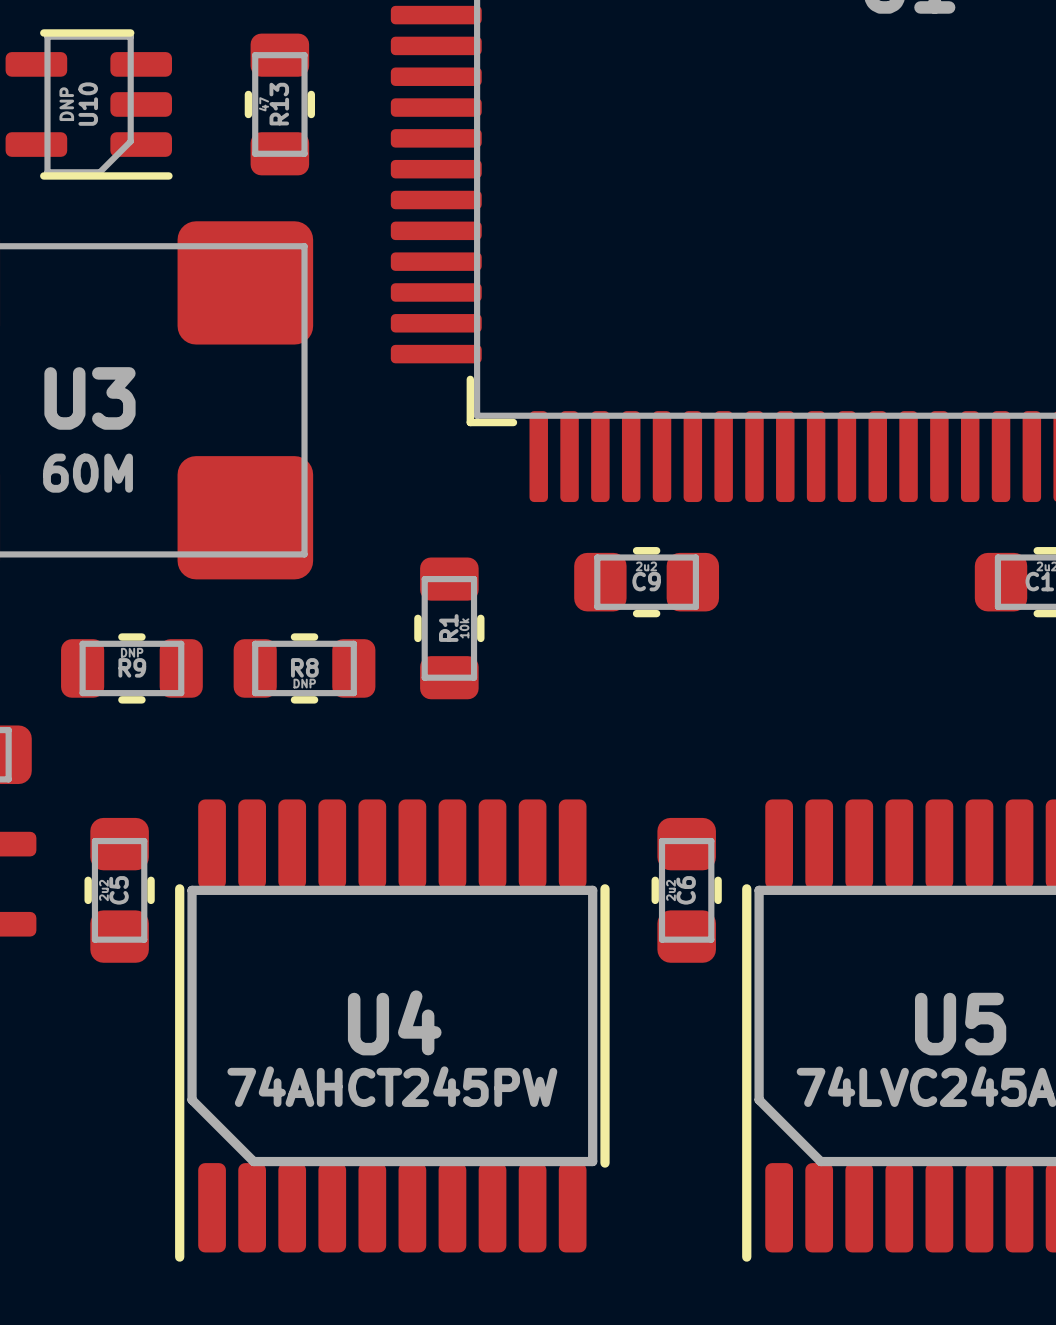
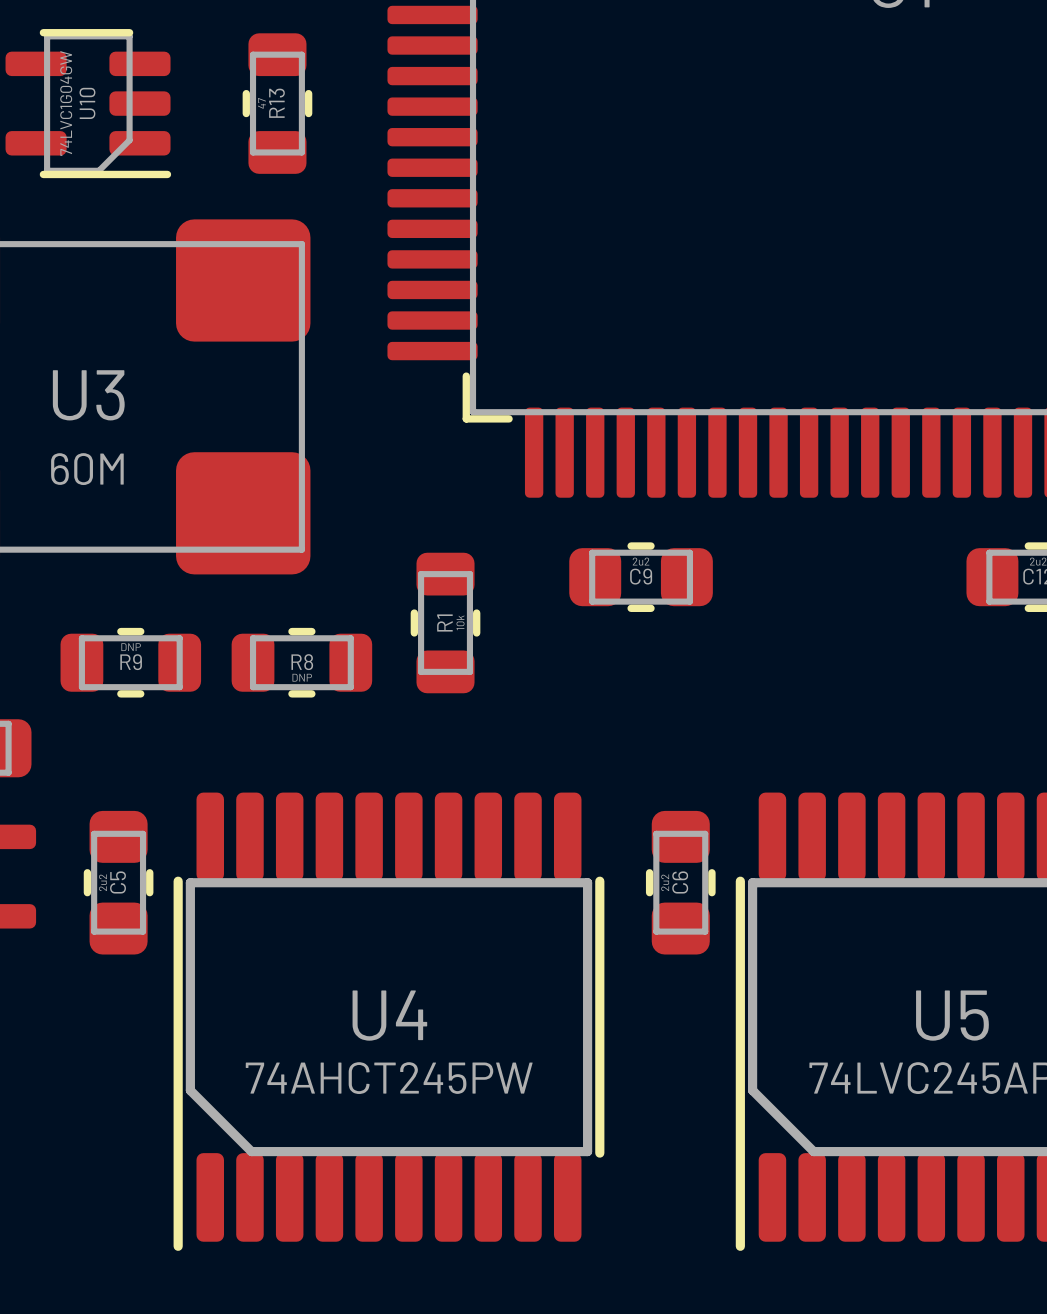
U10 value: DNP (66, 104) -> 74LVC1G04GW (66, 103)

